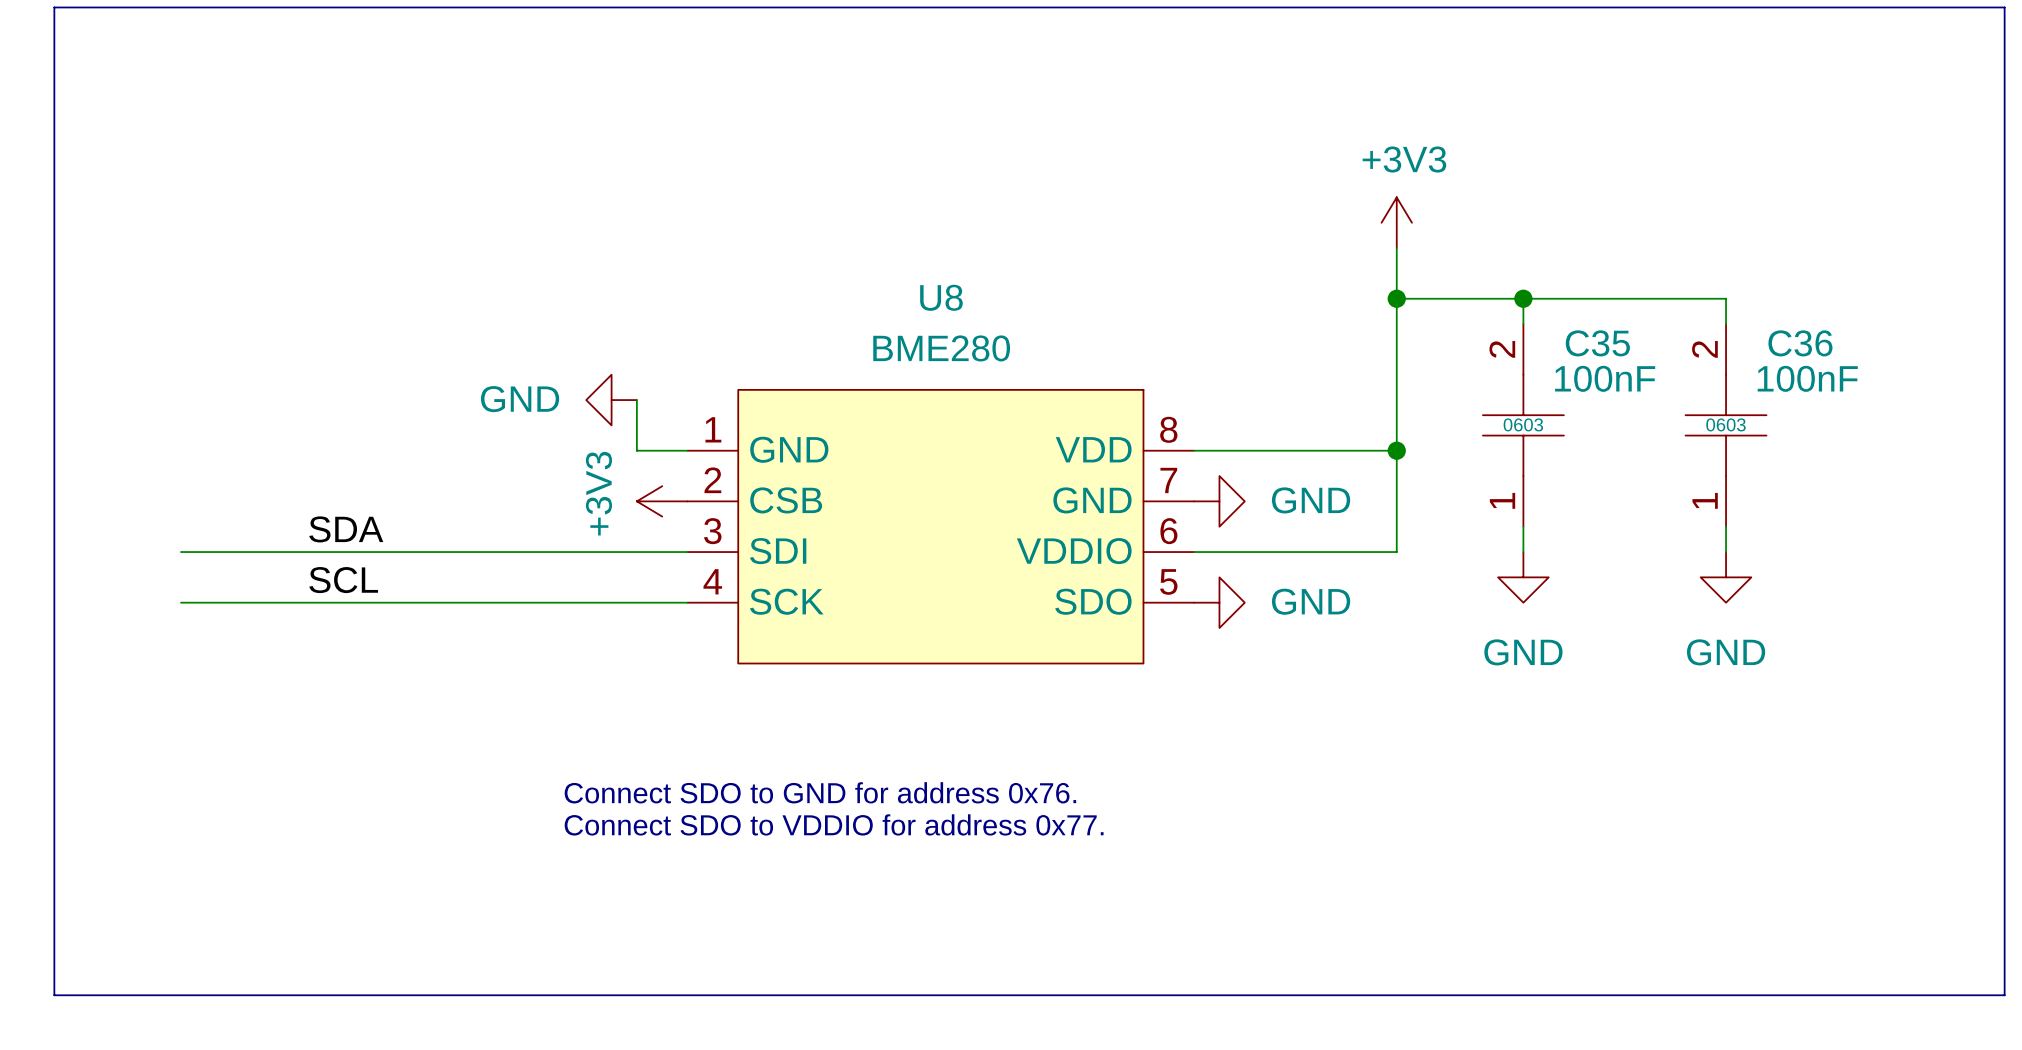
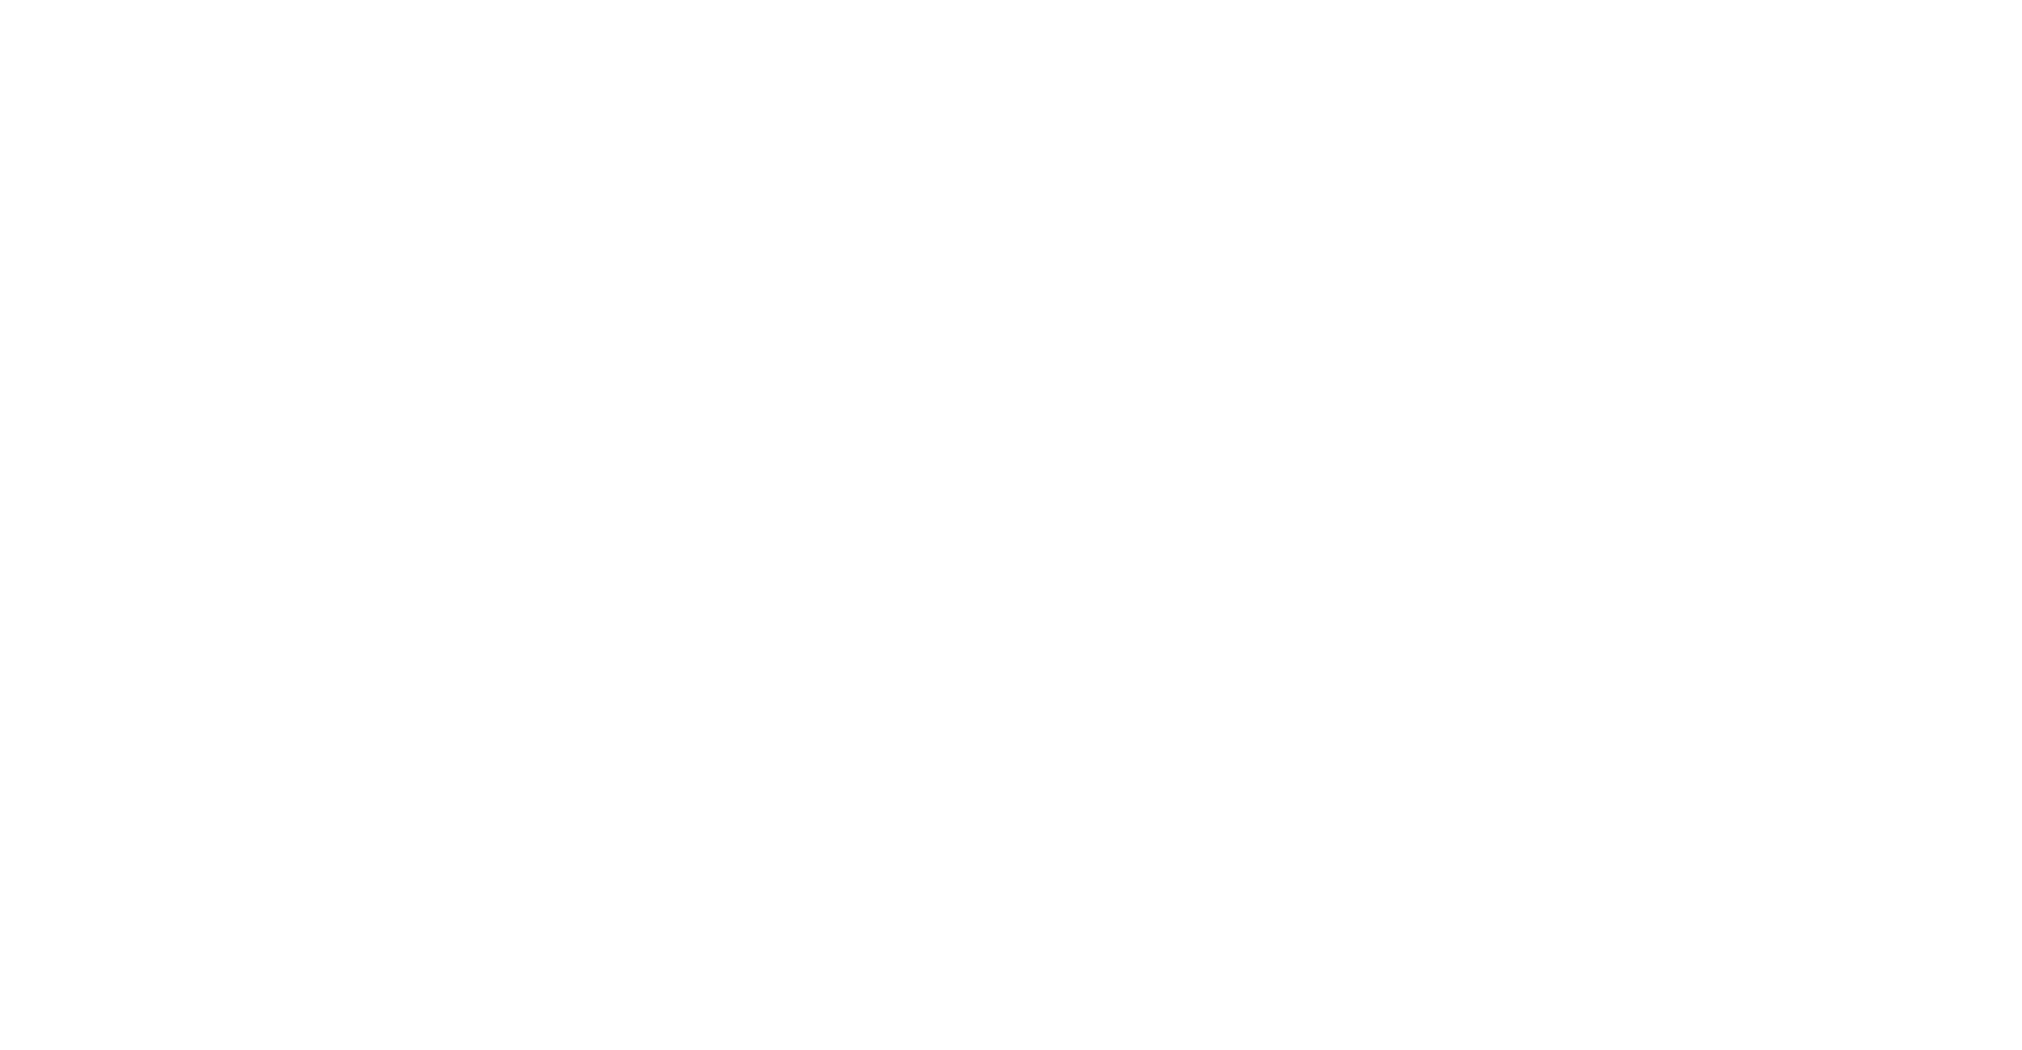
line: (54, 7) (2004, 7) (2004, 995) (54, 995) (54, 7) -> none
power symbol: +3V3 (1396, 222) -> none
wire: (1396, 248) (1396, 552) (1194, 552) -> none
wire: (1396, 298) (1726, 298) (1726, 324) -> none
junction: (1396, 298) -> none
wire: (1523, 298) (1523, 324) -> none
junction: (1523, 298) -> none
power symbol: GND (611, 400) -> none
wire: (636, 400) (636, 450) (687, 450) -> none
C35: (1523, 425) -> none
C36: (1726, 425) -> none
wire: (1194, 450) (1396, 450) -> none
junction: (1396, 450) -> none
power symbol: +3V3 (662, 501) -> none
power symbol: GND (1219, 501) -> none
U8: BME280 (940, 526) -> none
wire: (1523, 526) (1523, 552) -> none
wire: (1726, 526) (1726, 552) -> none
label: SDA (346, 529) -> none
wire: (181, 552) (687, 552) -> none
power symbol: GND (1523, 577) -> none
power symbol: GND (1726, 577) -> none
label: SCL (343, 580) -> none
wire: (181, 602) (687, 602) -> none
power symbol: GND (1219, 602) -> none
text: Connect SDO to GND for address 0x76. (820, 792) -> none
text: Connect SDO to VDDIO for address 0x77. (834, 824) -> none

